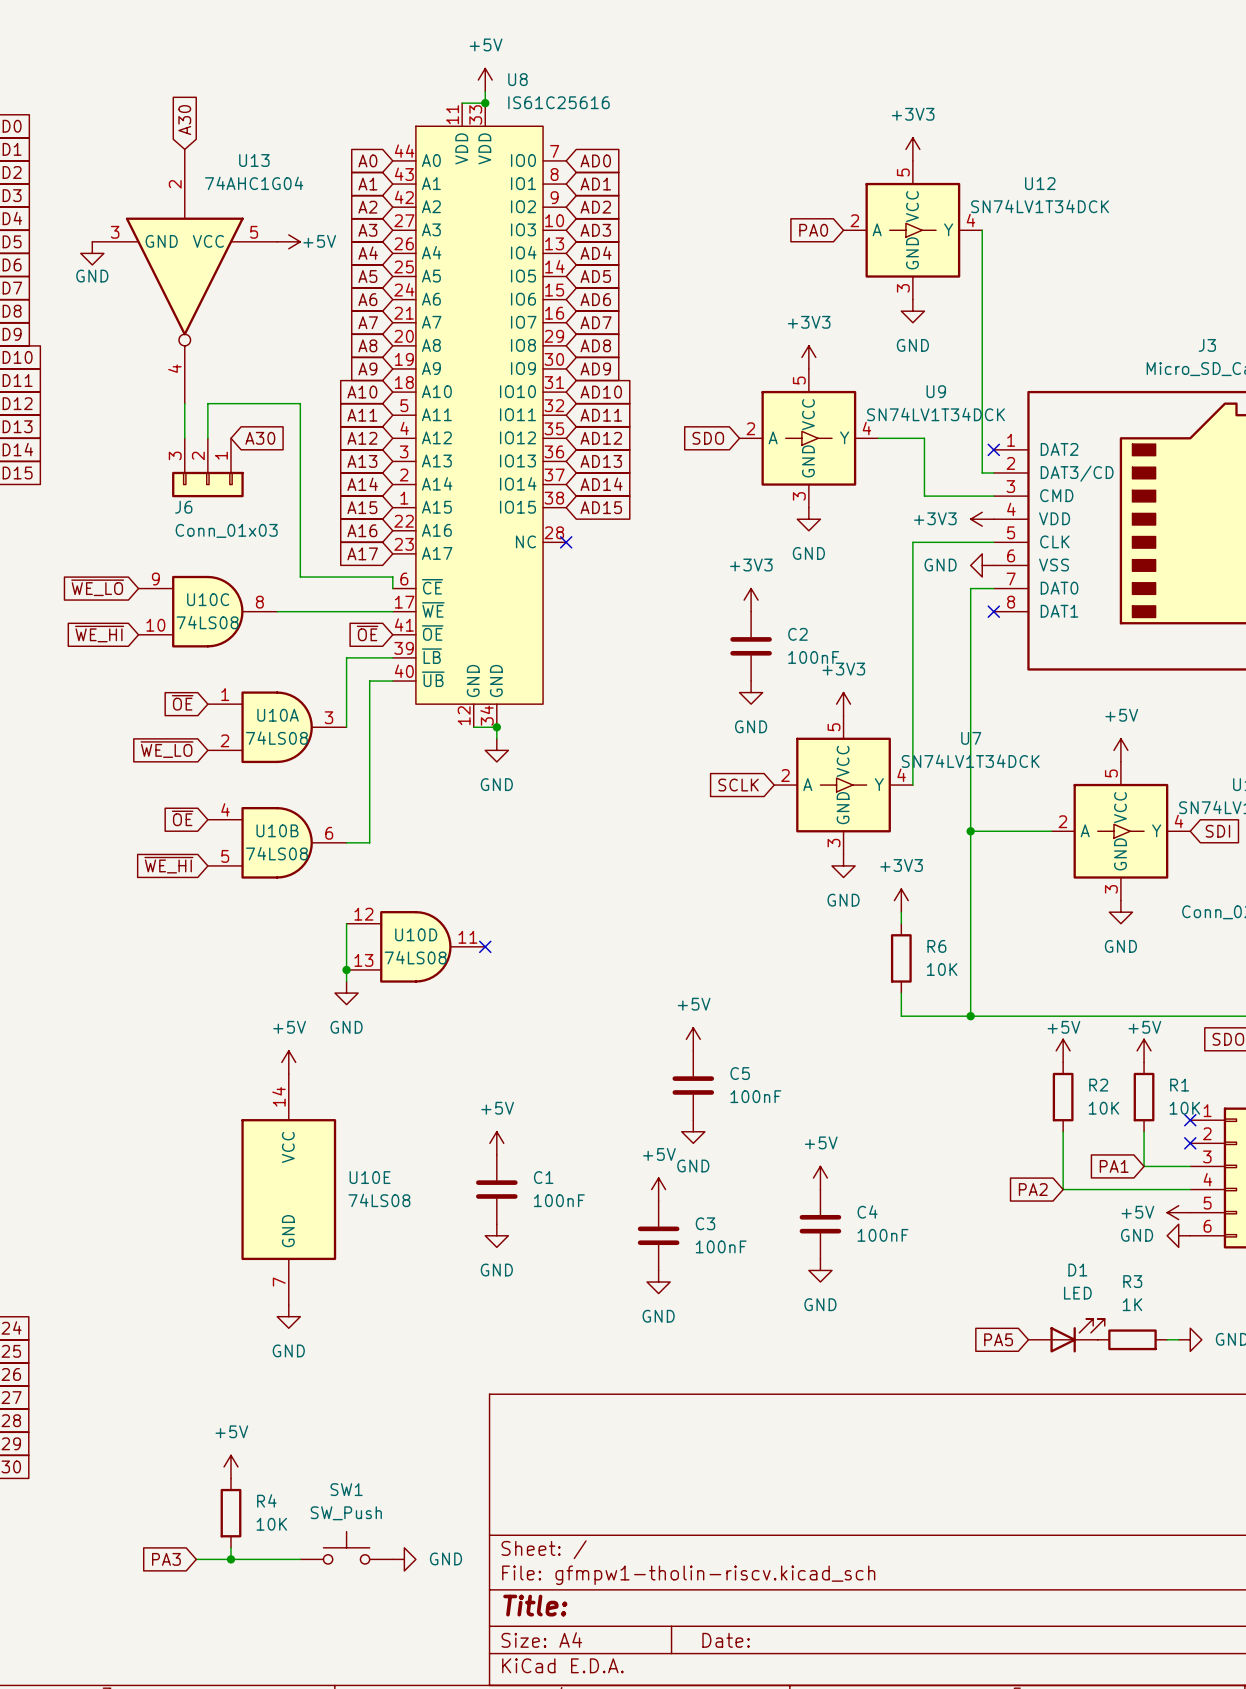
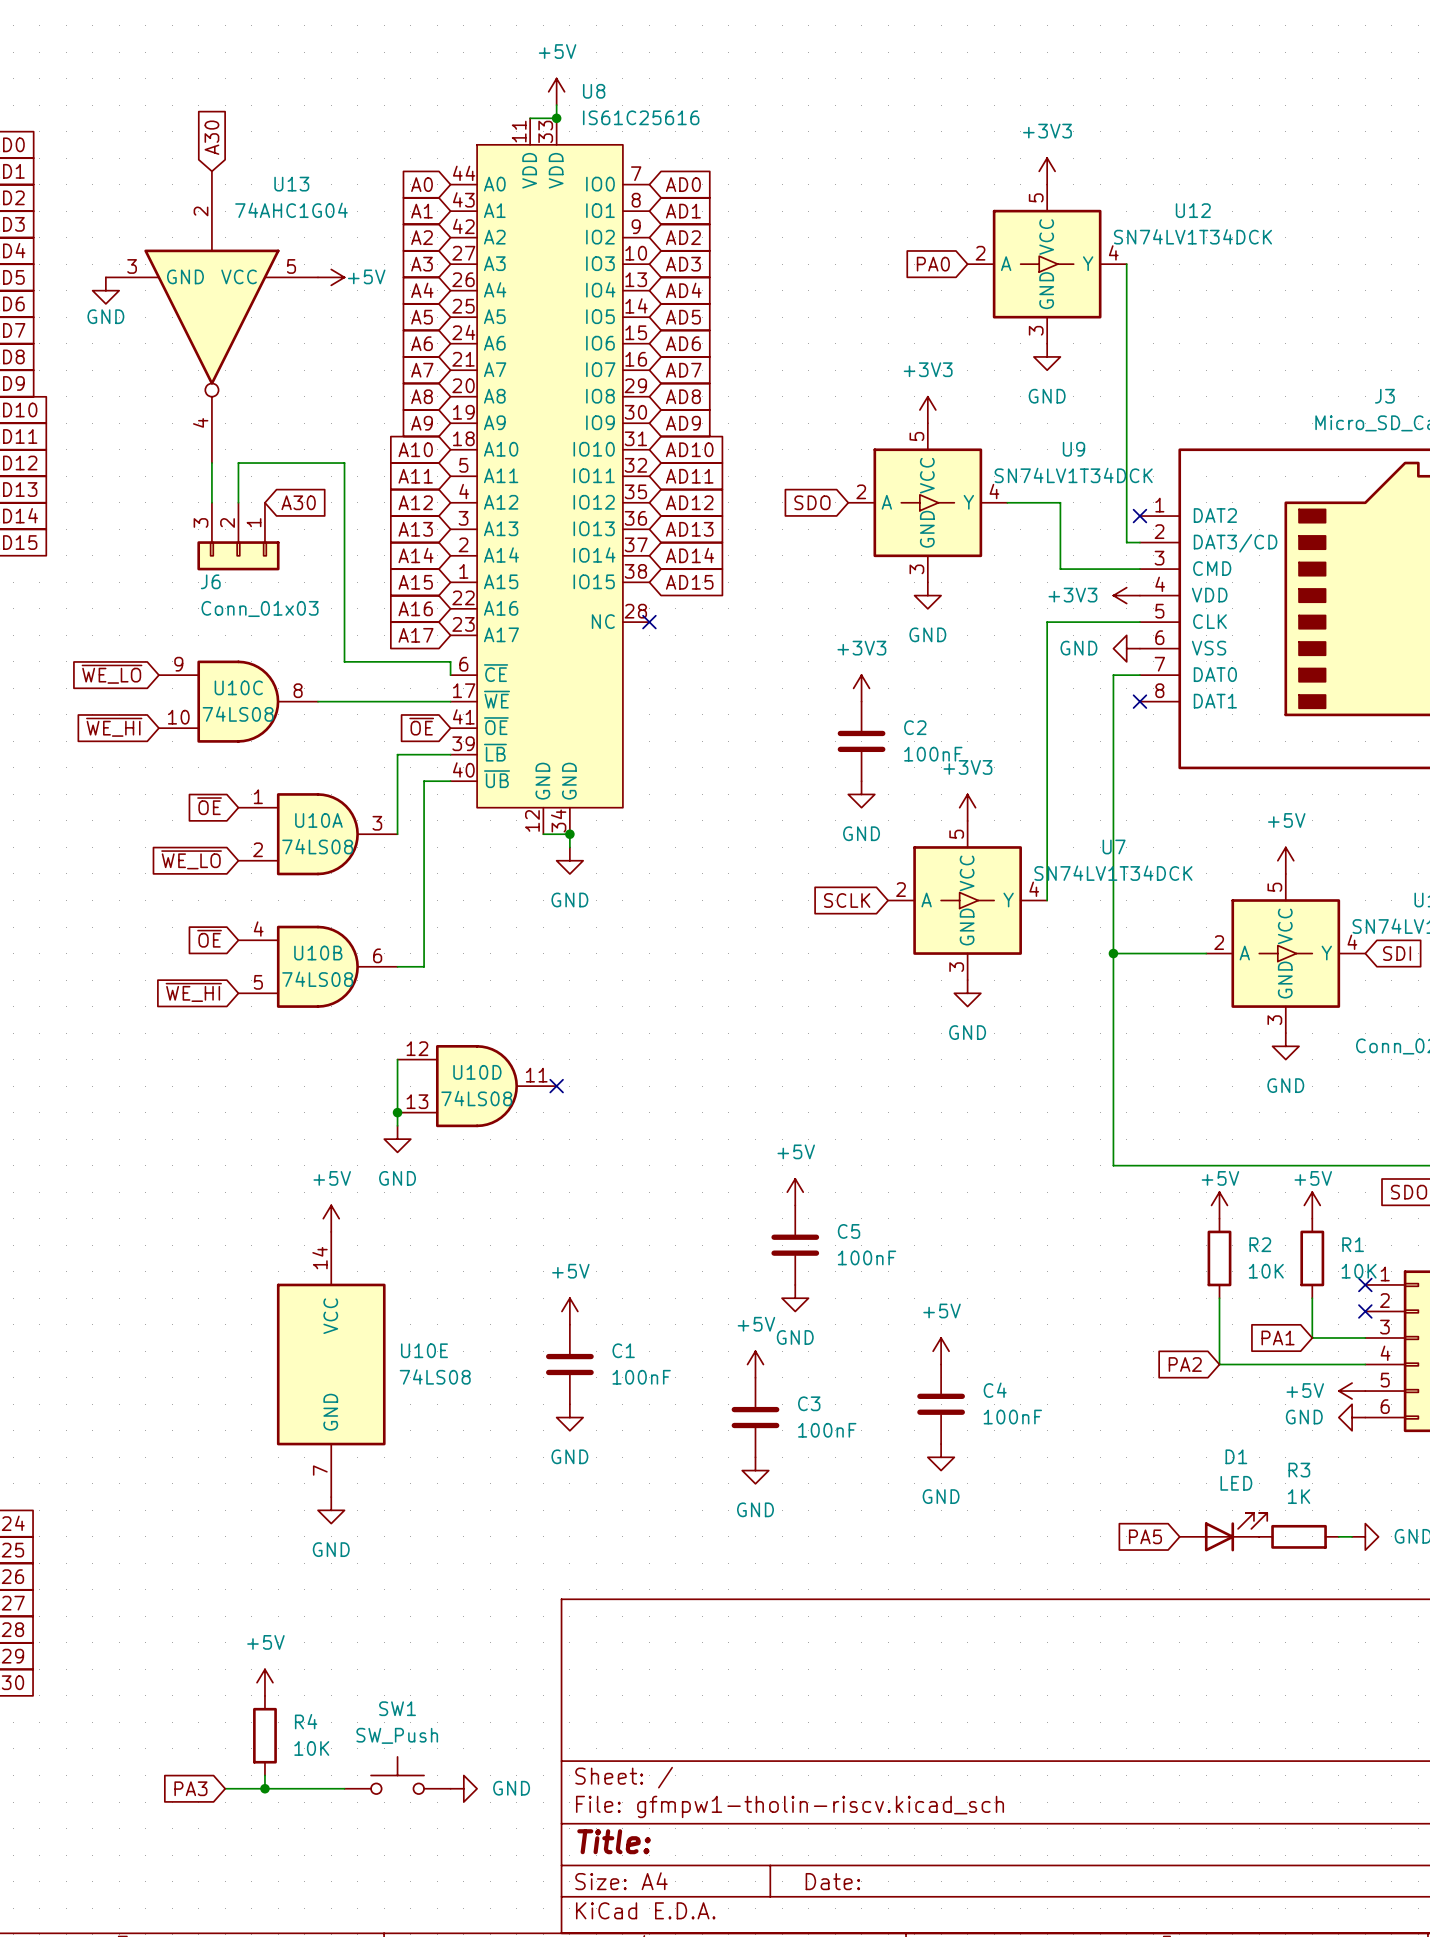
power symbol: +3V3 (901, 900) -> none
wire: (901, 912) (901, 923) -> none
R6: 10K (901, 958) -> none
wire: (901, 993) (901, 1016) (970, 1016) -> none
junction: (970, 1016) -> none

